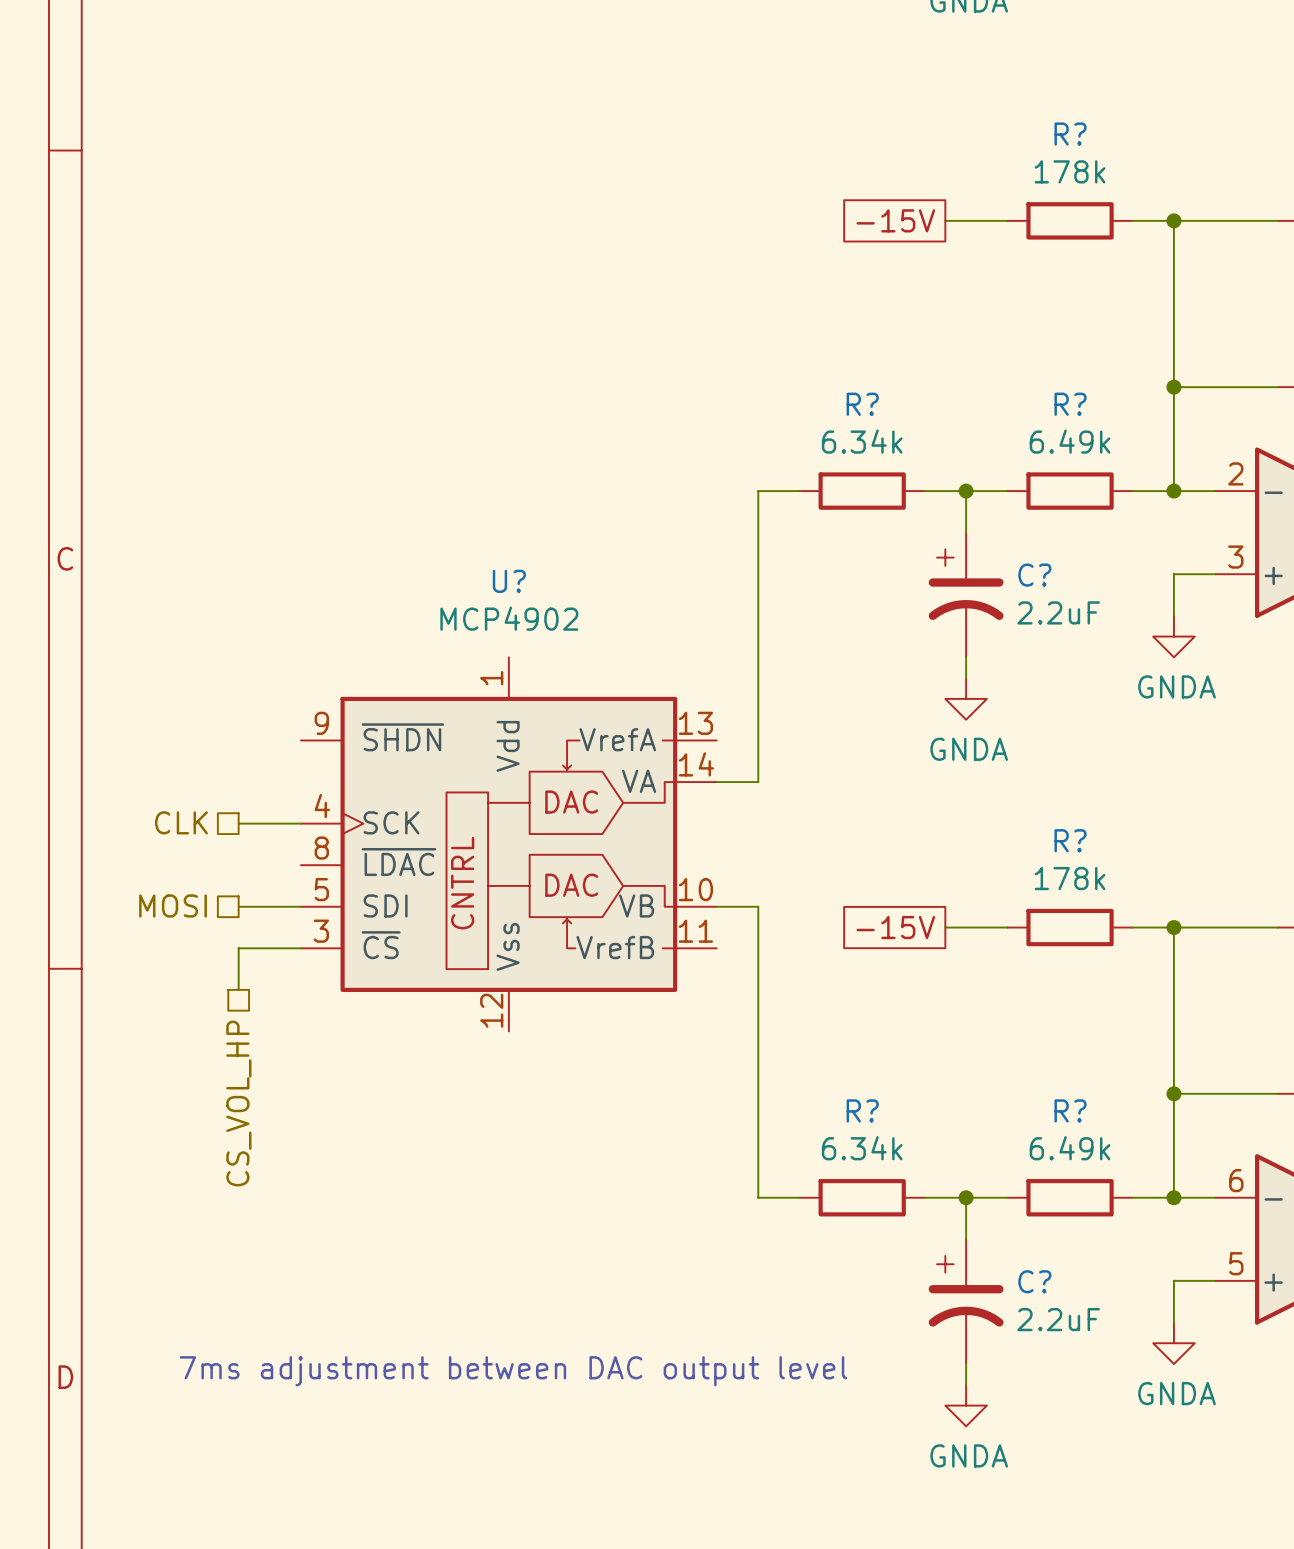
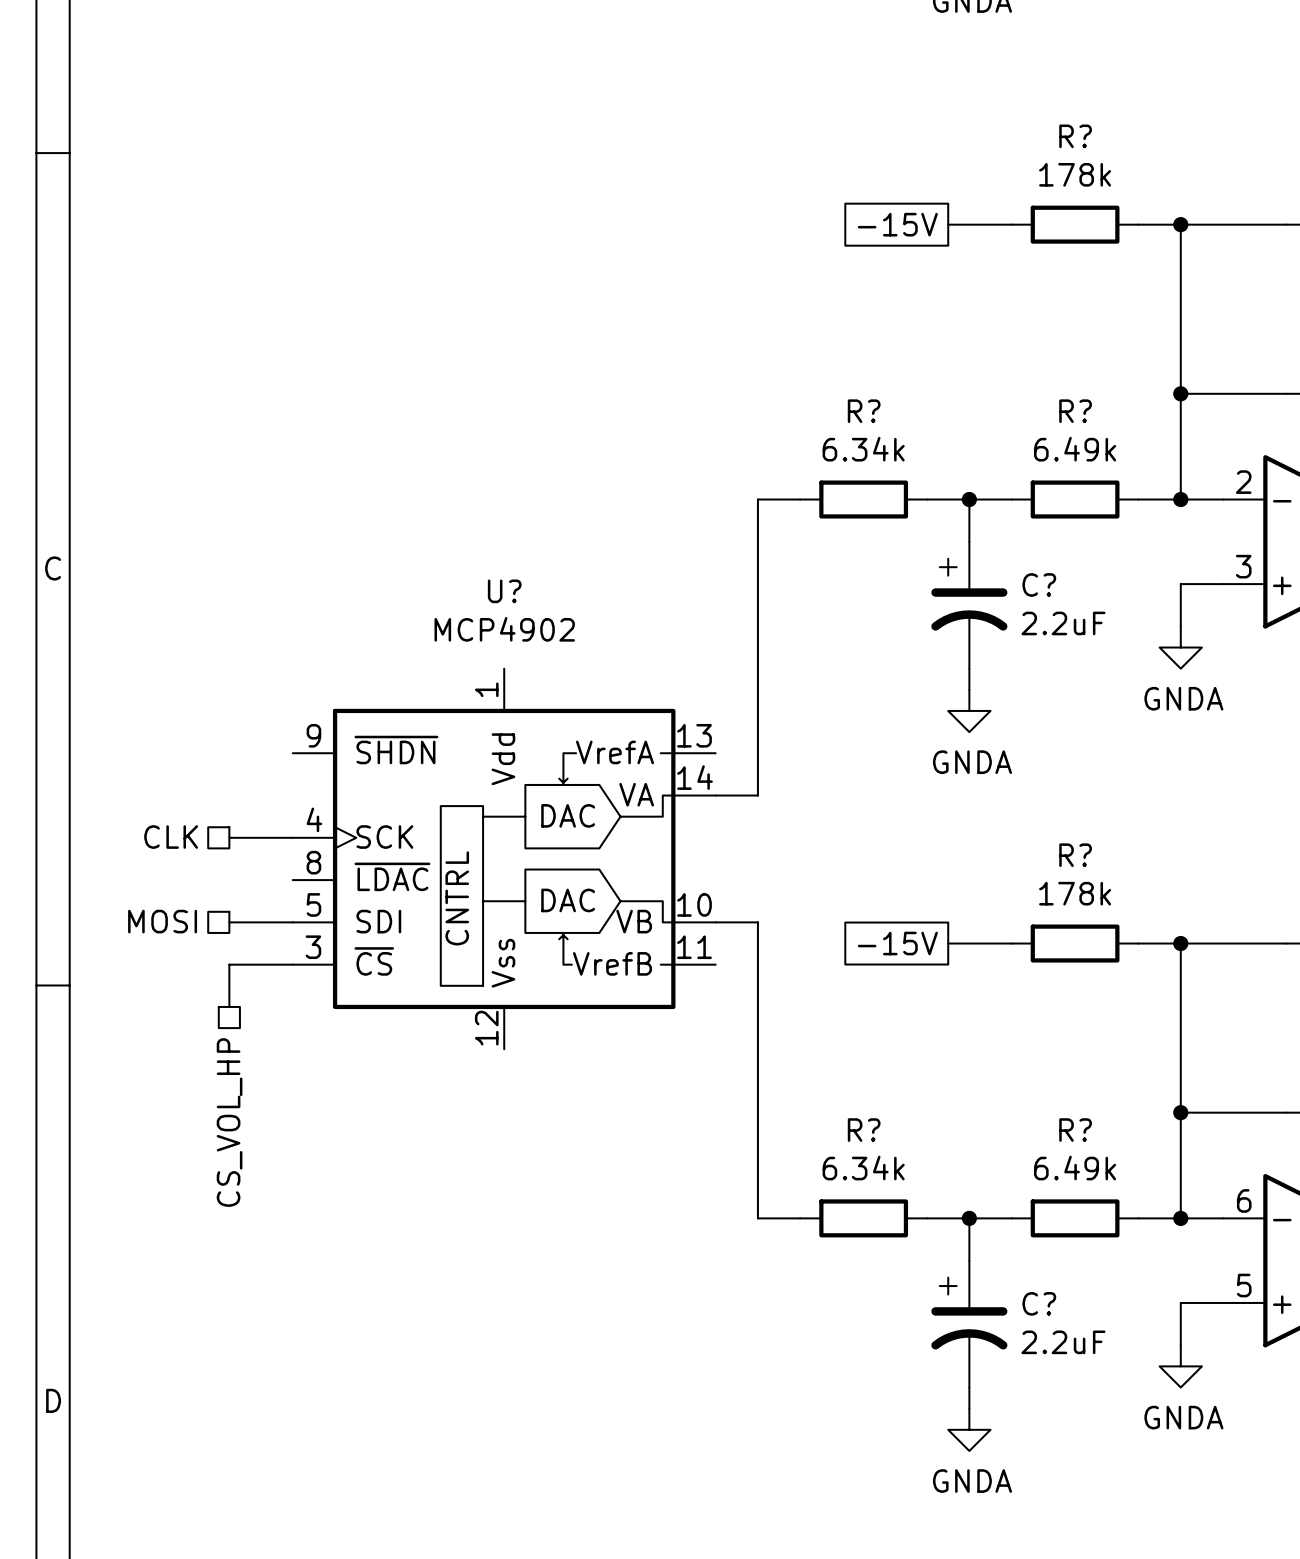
text: 7ms adjustment between DAC output level (513, 1371) -> none

